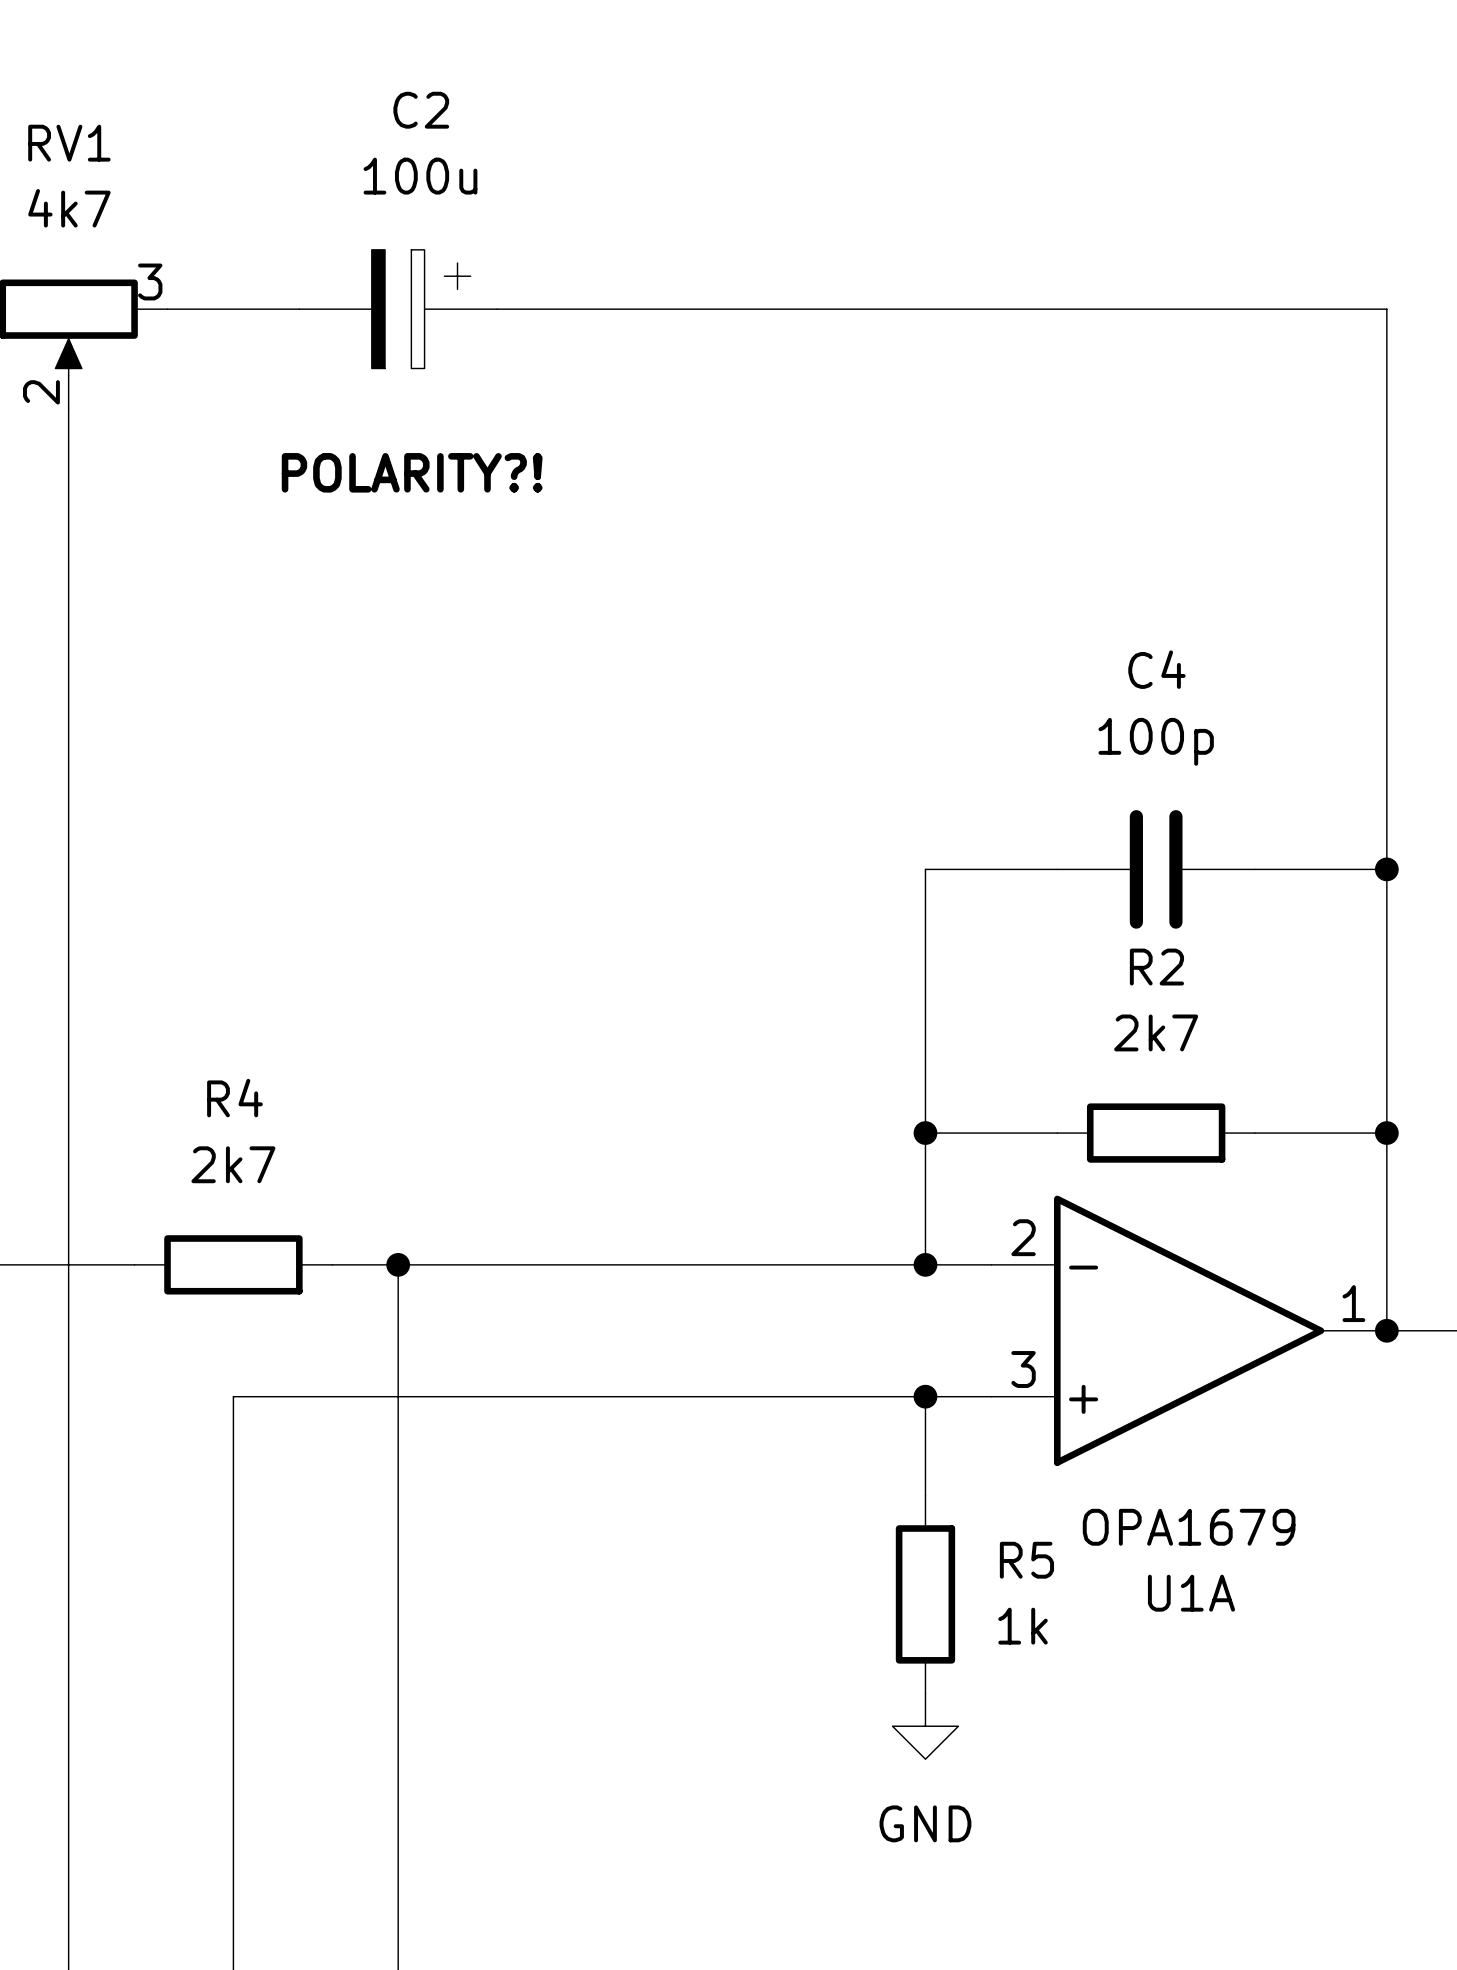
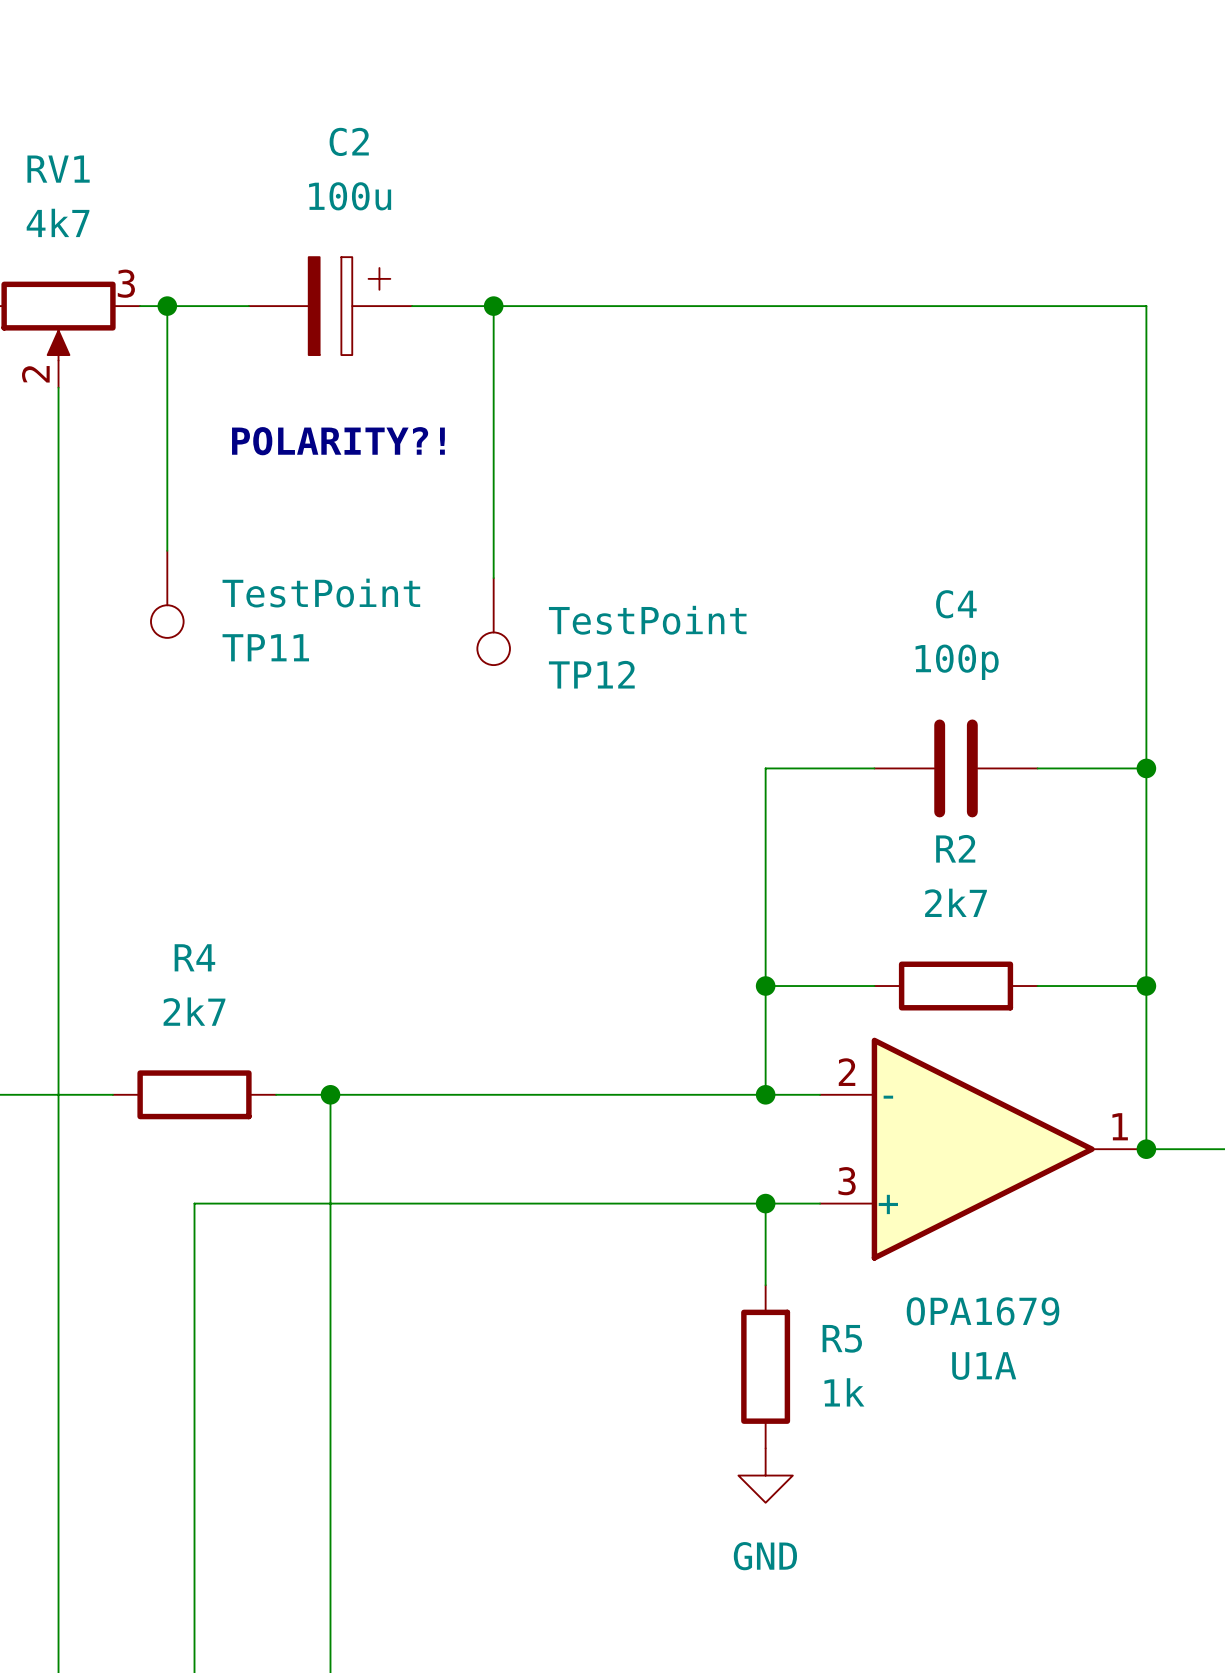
wire: none -> (167, 306) (167, 550)
junction: none -> (167, 306)
wire: none -> (493, 306) (493, 578)
junction: none -> (493, 306)
TP11: none -> TestPoint (167, 594)
TP12: none -> TestPoint (493, 621)

